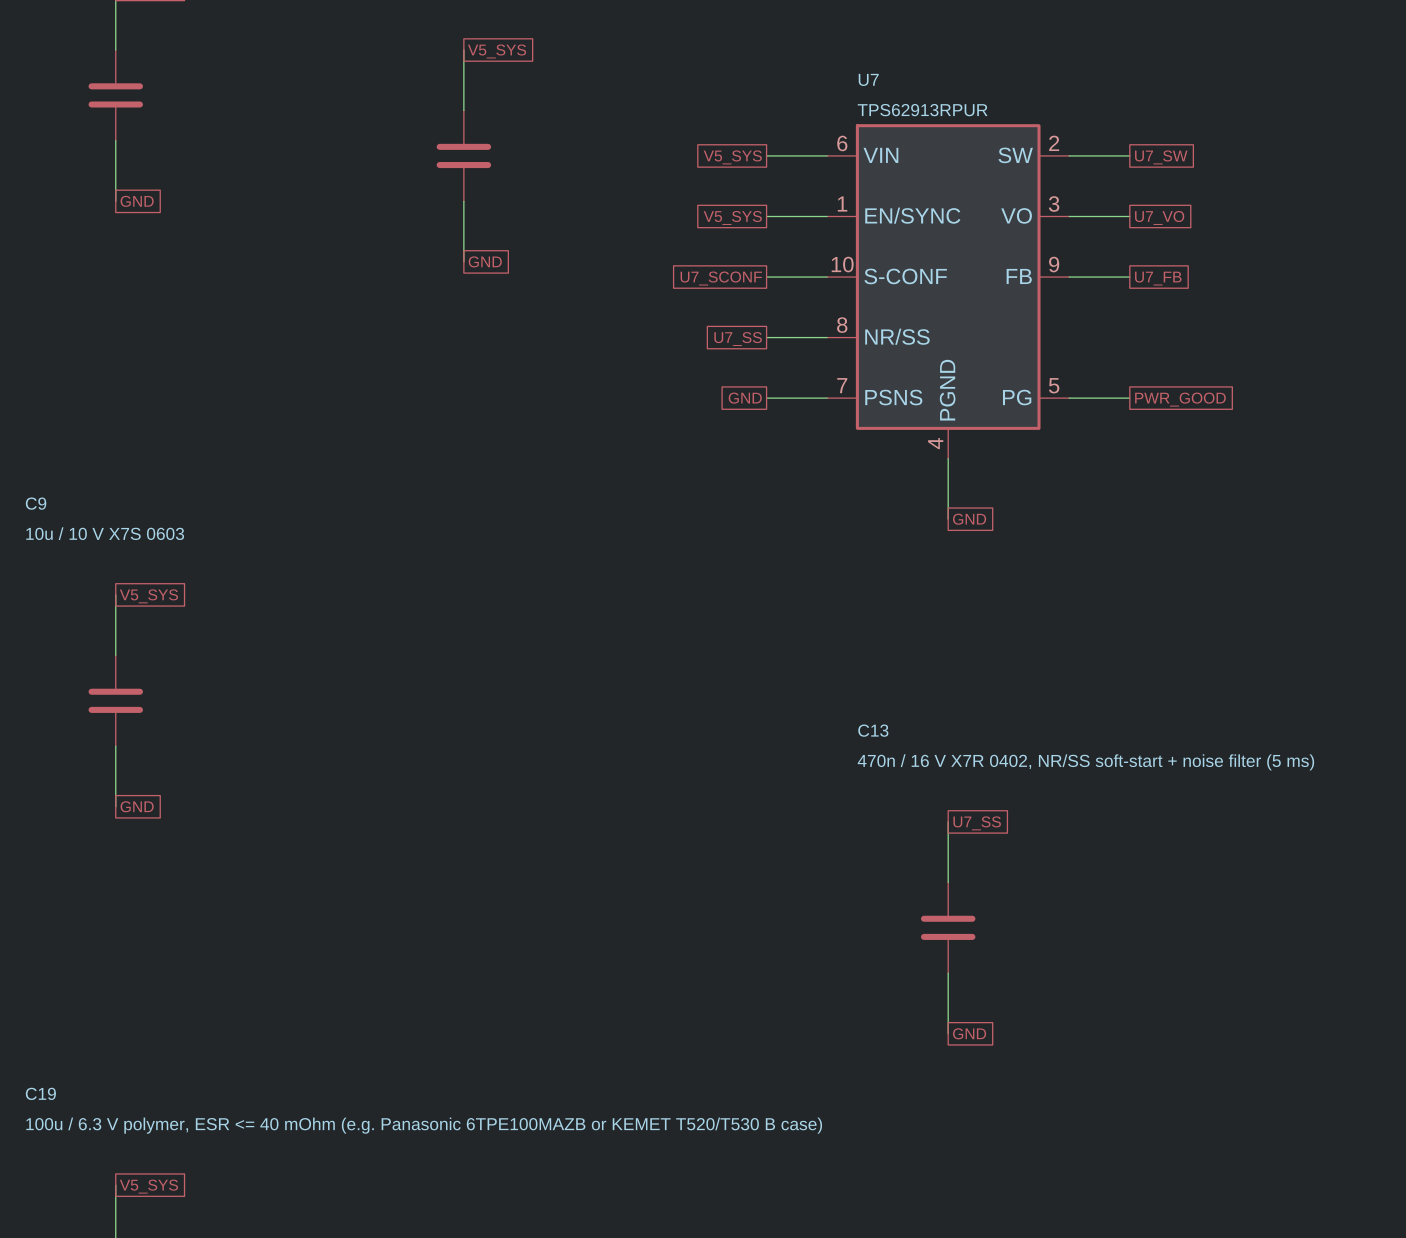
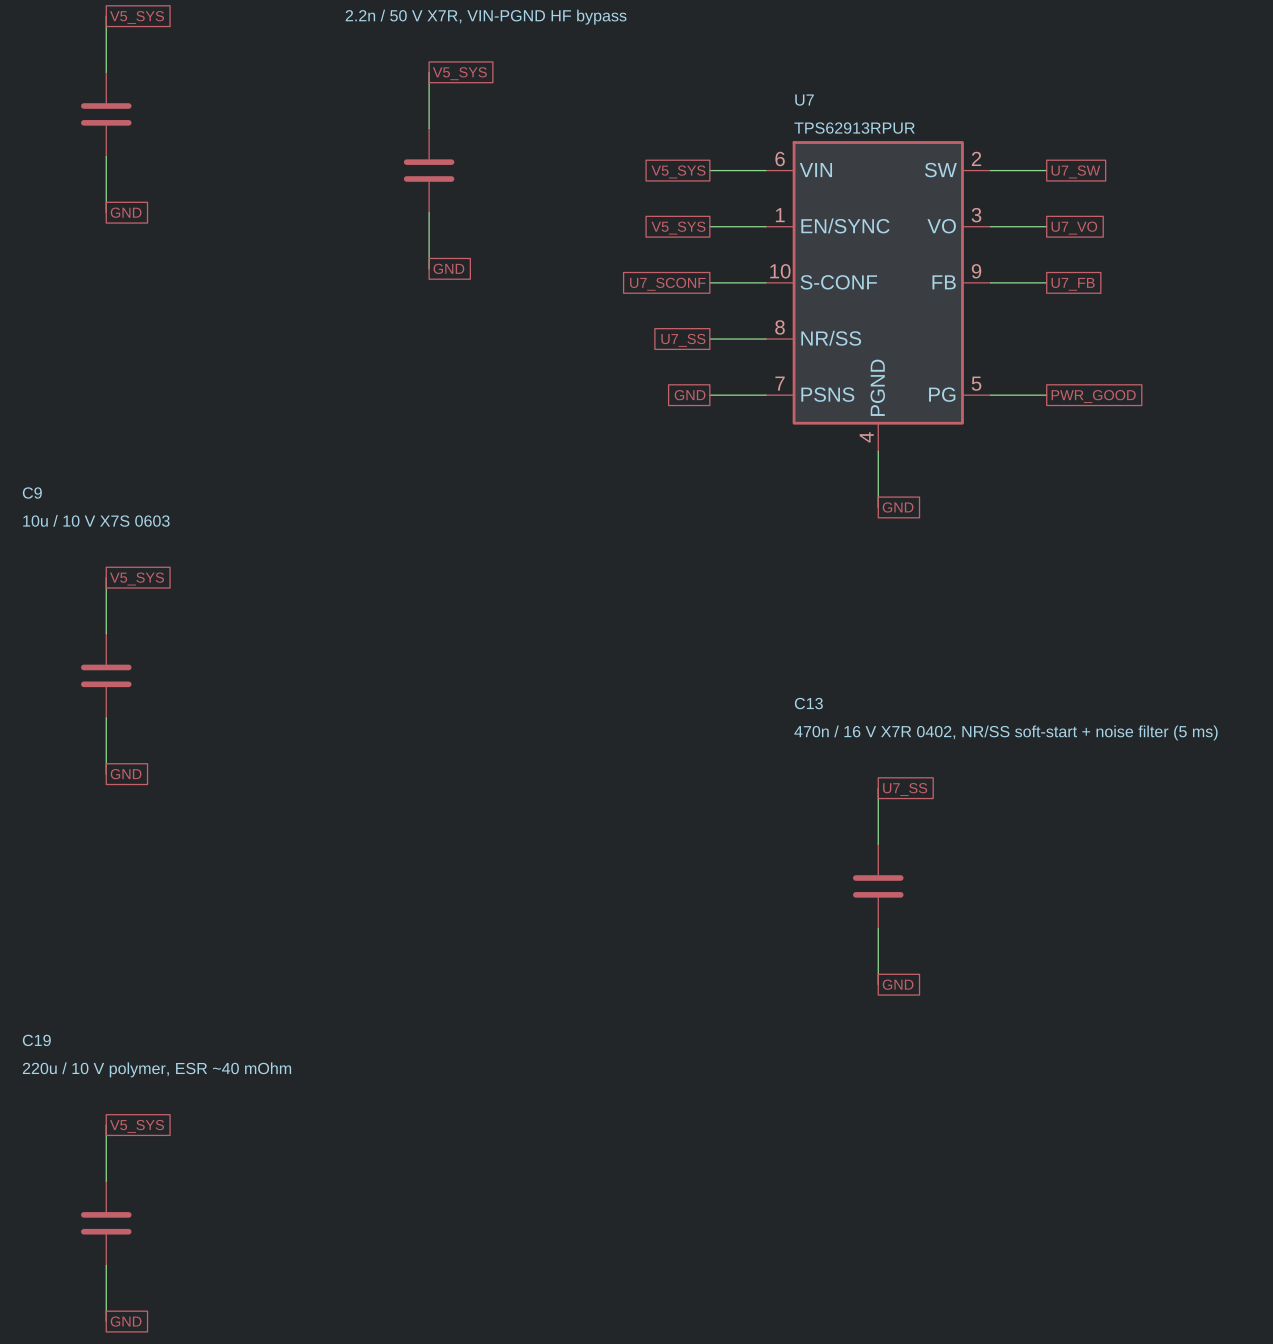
C19 value: 100u / 6.3 V polymer, ESR <= 40 mOhm (e.g. Panasonic 6TPE100MAZB or KEMET T520/T530 B case) (424, 1125) -> 220u / 10 V polymer, ESR ~40 mOhm (156, 1069)

